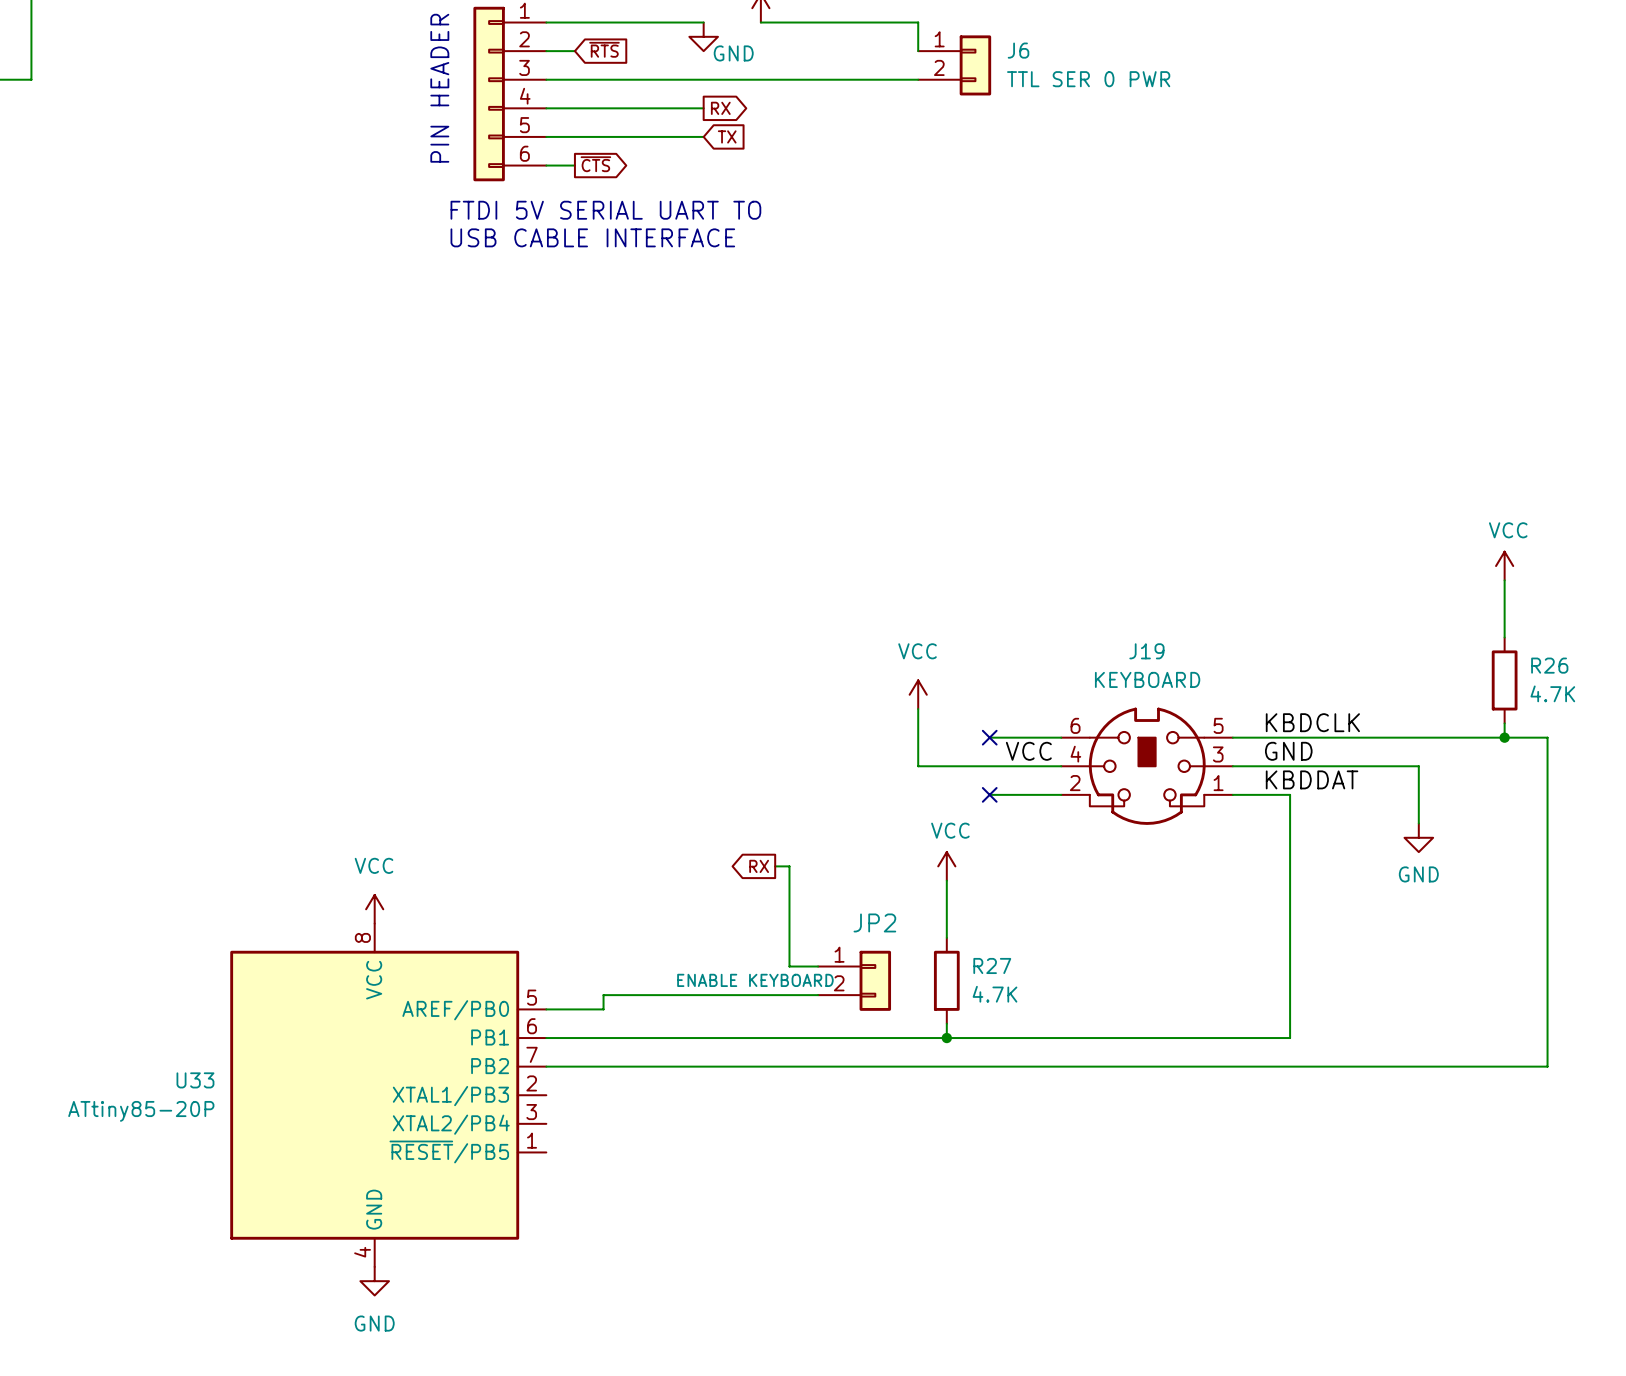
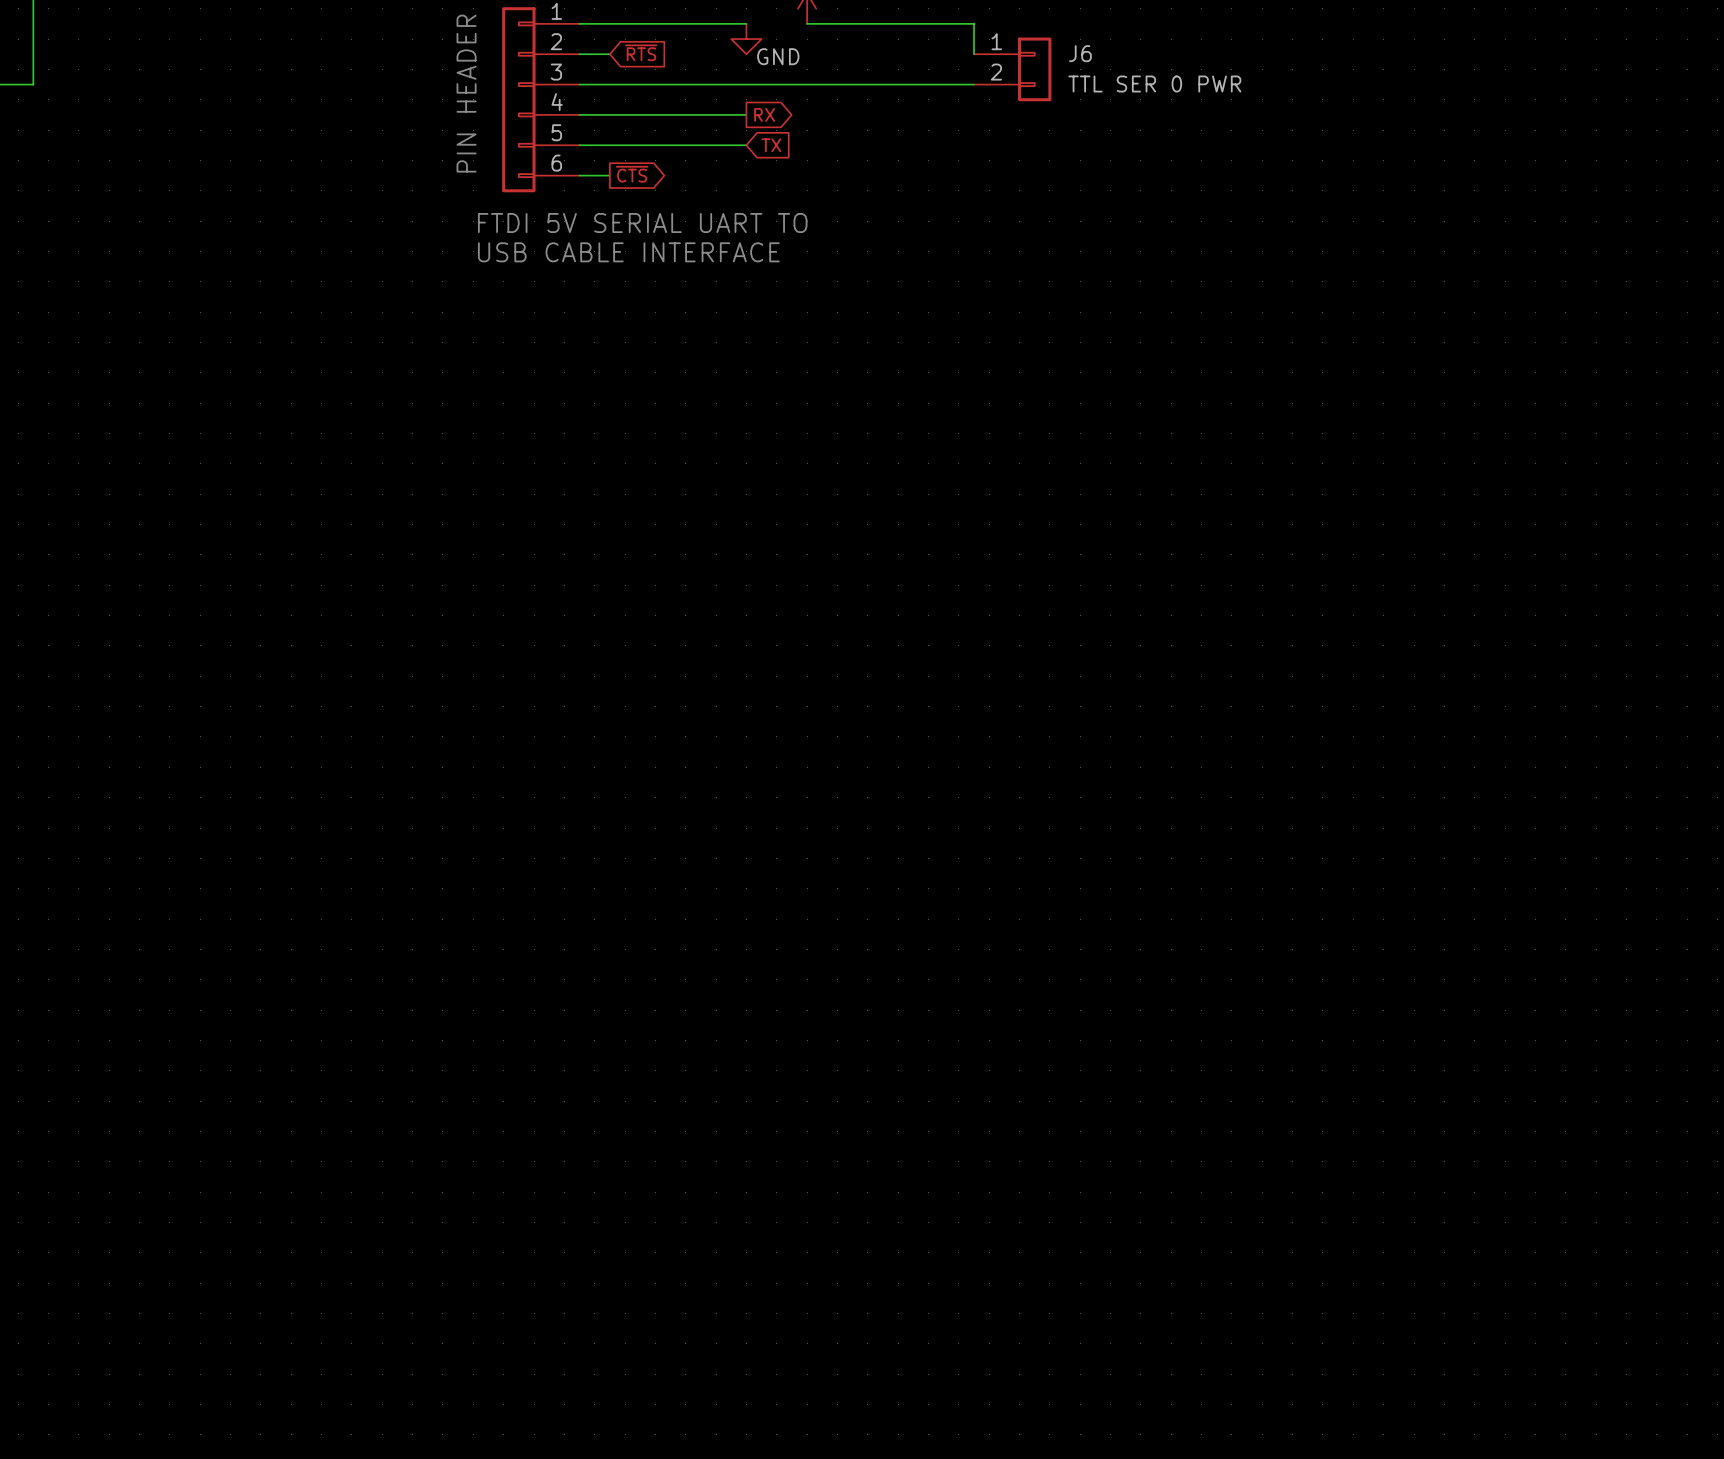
power symbol: VCC (1504, 566) -> none
wire: (1504, 580) (1504, 637) -> none
R26: 4.7K (1504, 680) -> none
power symbol: VCC (918, 694) -> none
wire: (918, 709) (918, 766) (1061, 766) -> none
label: KBDCLK (1312, 722) -> none
wire: (1504, 723) (1504, 737) -> none
wire: (989, 737) (1061, 737) -> none
no-connect mark: (989, 737) -> none
wire: (1232, 737) (1547, 737) (1547, 1066) (546, 1066) -> none
junction: (1504, 737) -> none
label: VCC (1028, 751) -> none
label: GND (1288, 751) -> none
J19: KEYBOARD (1147, 766) -> none
wire: (1232, 766) (1418, 766) (1418, 823) -> none
label: KBDDAT (1312, 779) -> none
wire: (989, 794) (1061, 794) -> none
no-connect mark: (989, 794) -> none
wire: (1232, 794) (1290, 794) (1290, 1038) (546, 1038) -> none
power symbol: GND (1418, 837) -> none
global label: RX (759, 866) -> none
wire: (775, 866) (789, 866) (789, 966) (818, 966) -> none
power symbol: VCC (946, 866) -> none
wire: (946, 880) (946, 937) -> none
power symbol: VCC (374, 909) -> none
JP2: ENABLE KEYBOARD (854, 980) -> none
R27: 4.7K (946, 980) -> none
wire: (818, 995) (603, 995) (603, 1009) (546, 1009) -> none
wire: (946, 1023) (946, 1038) -> none
junction: (946, 1038) -> none
U33: ATtiny85-20P (388, 1095) -> none
power symbol: GND (374, 1281) -> none

